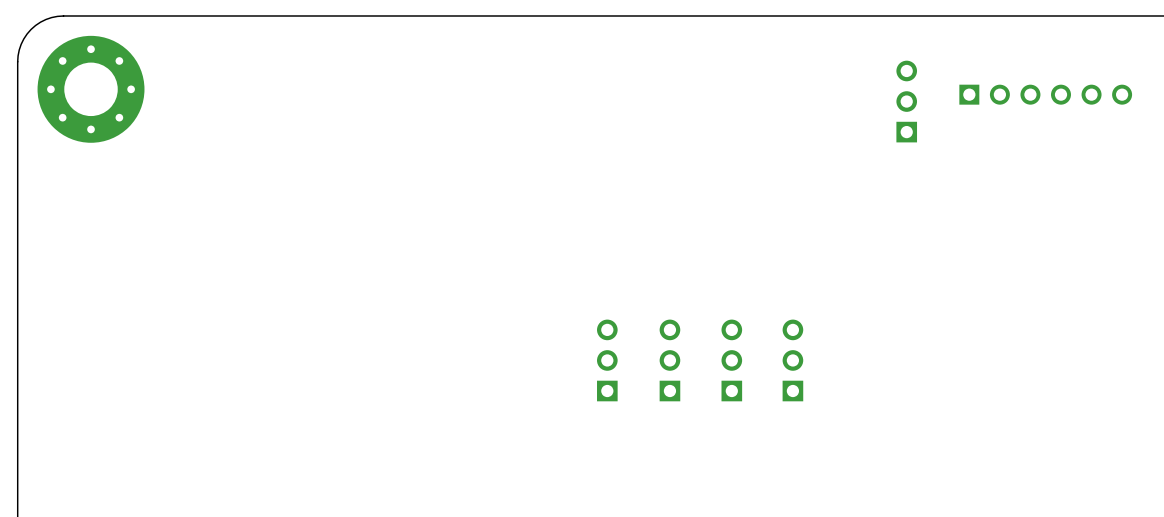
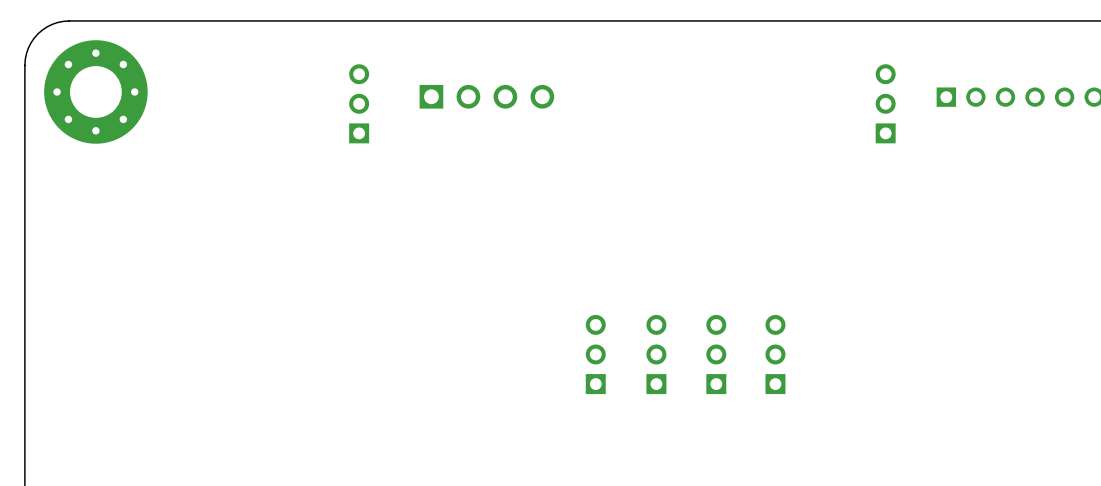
part: none -> (486, 96)
part: none -> (359, 103)

